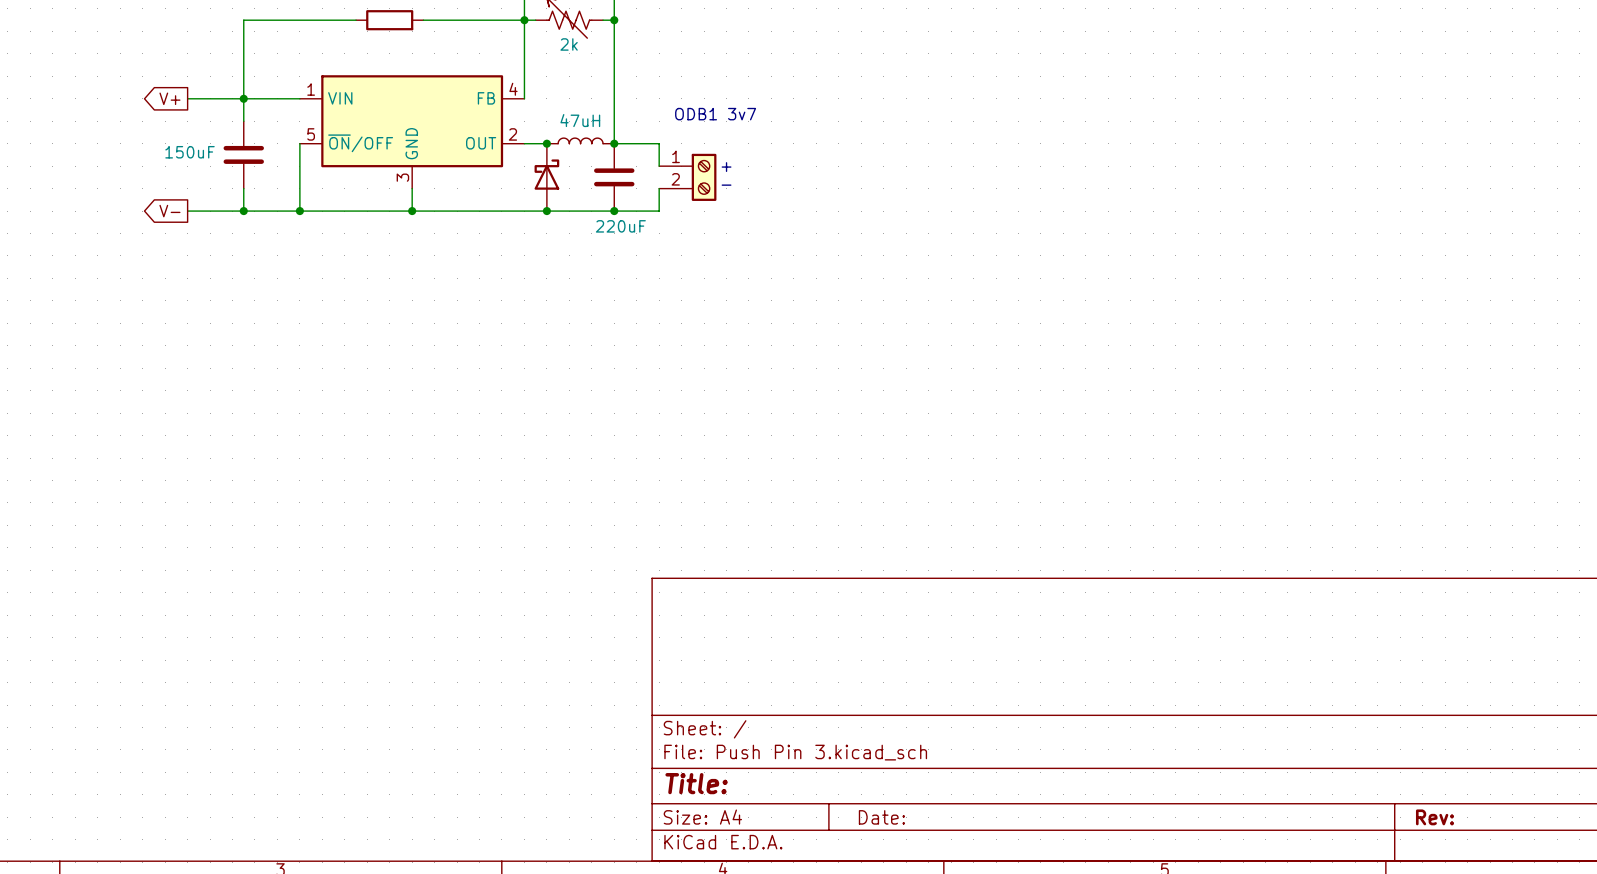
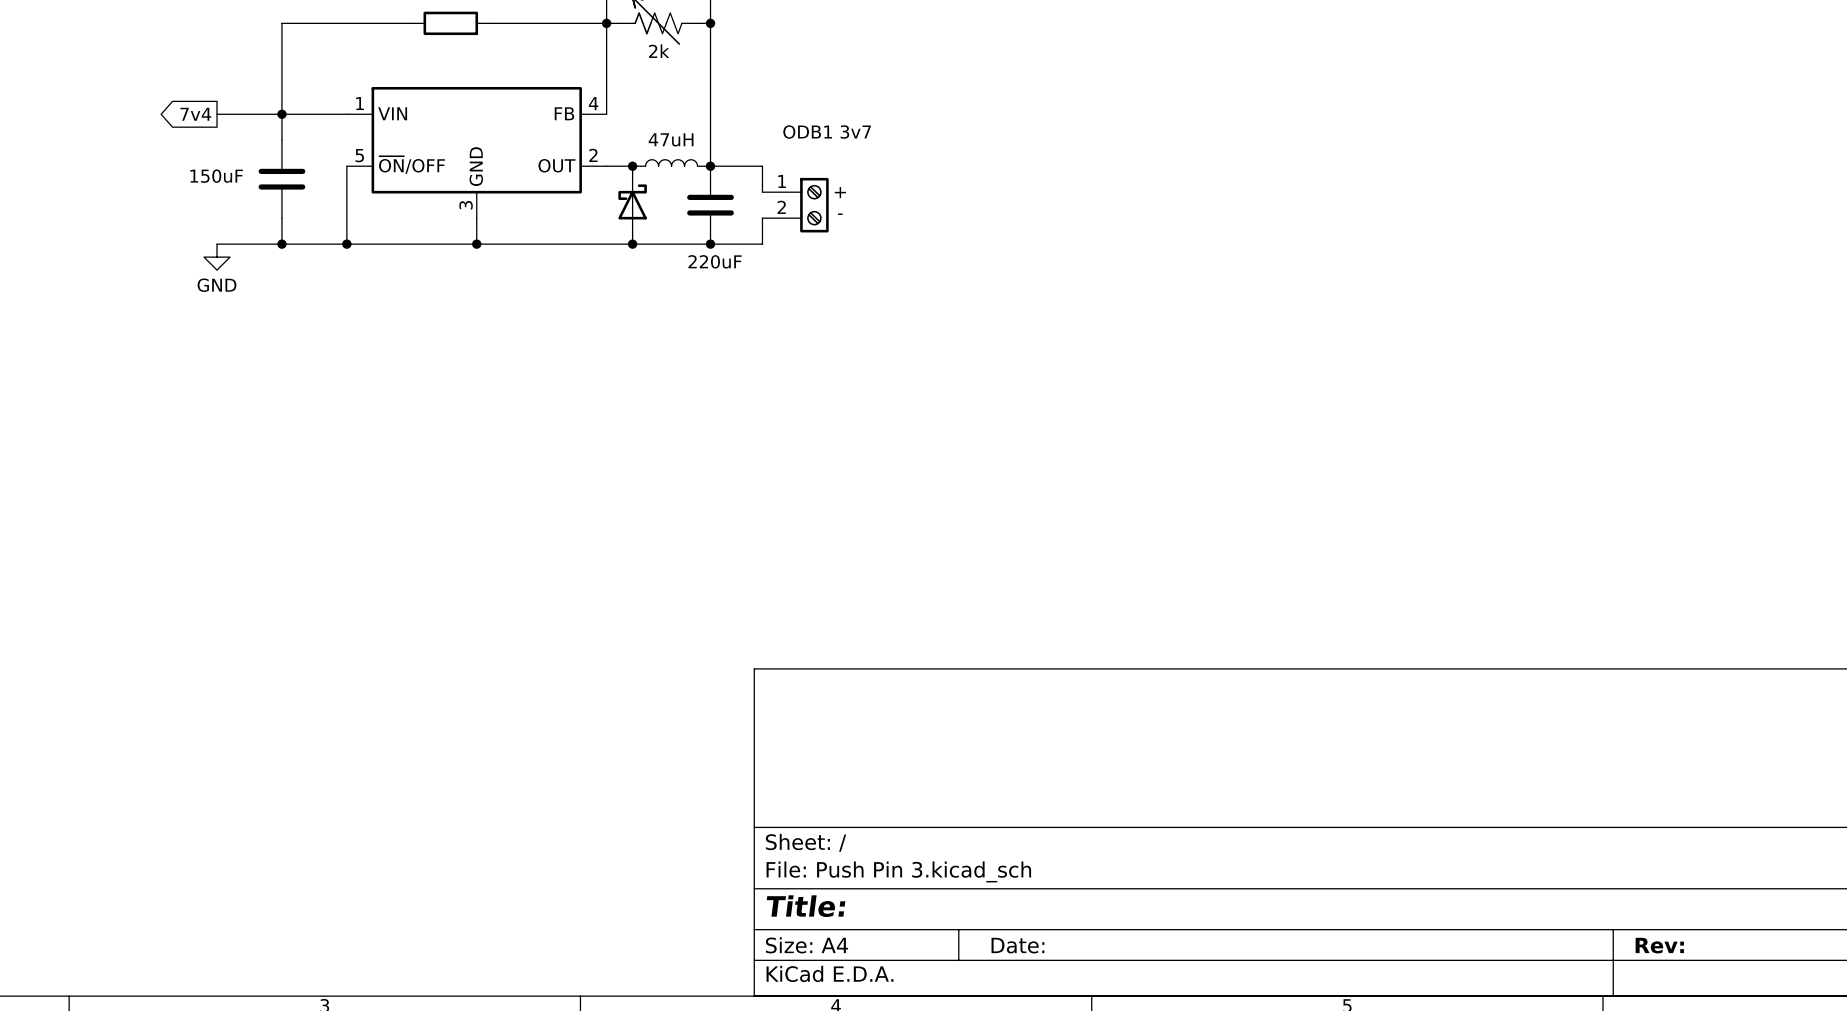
global label: V+ (169, 98) -> 7v4 (195, 114)
global label: V- (169, 211) -> none
power symbol: none -> GND (217, 257)

